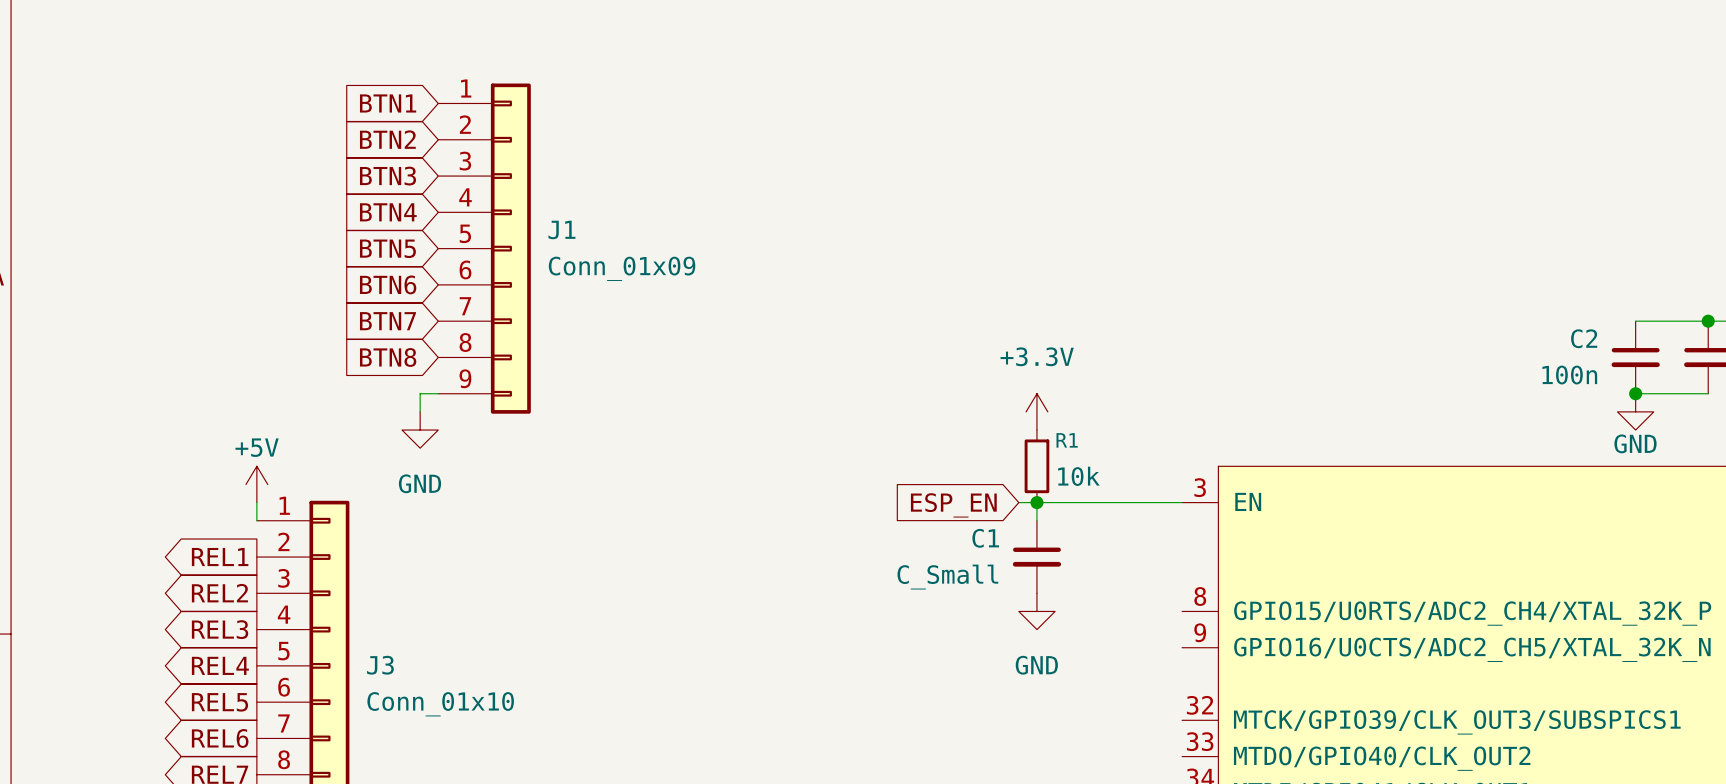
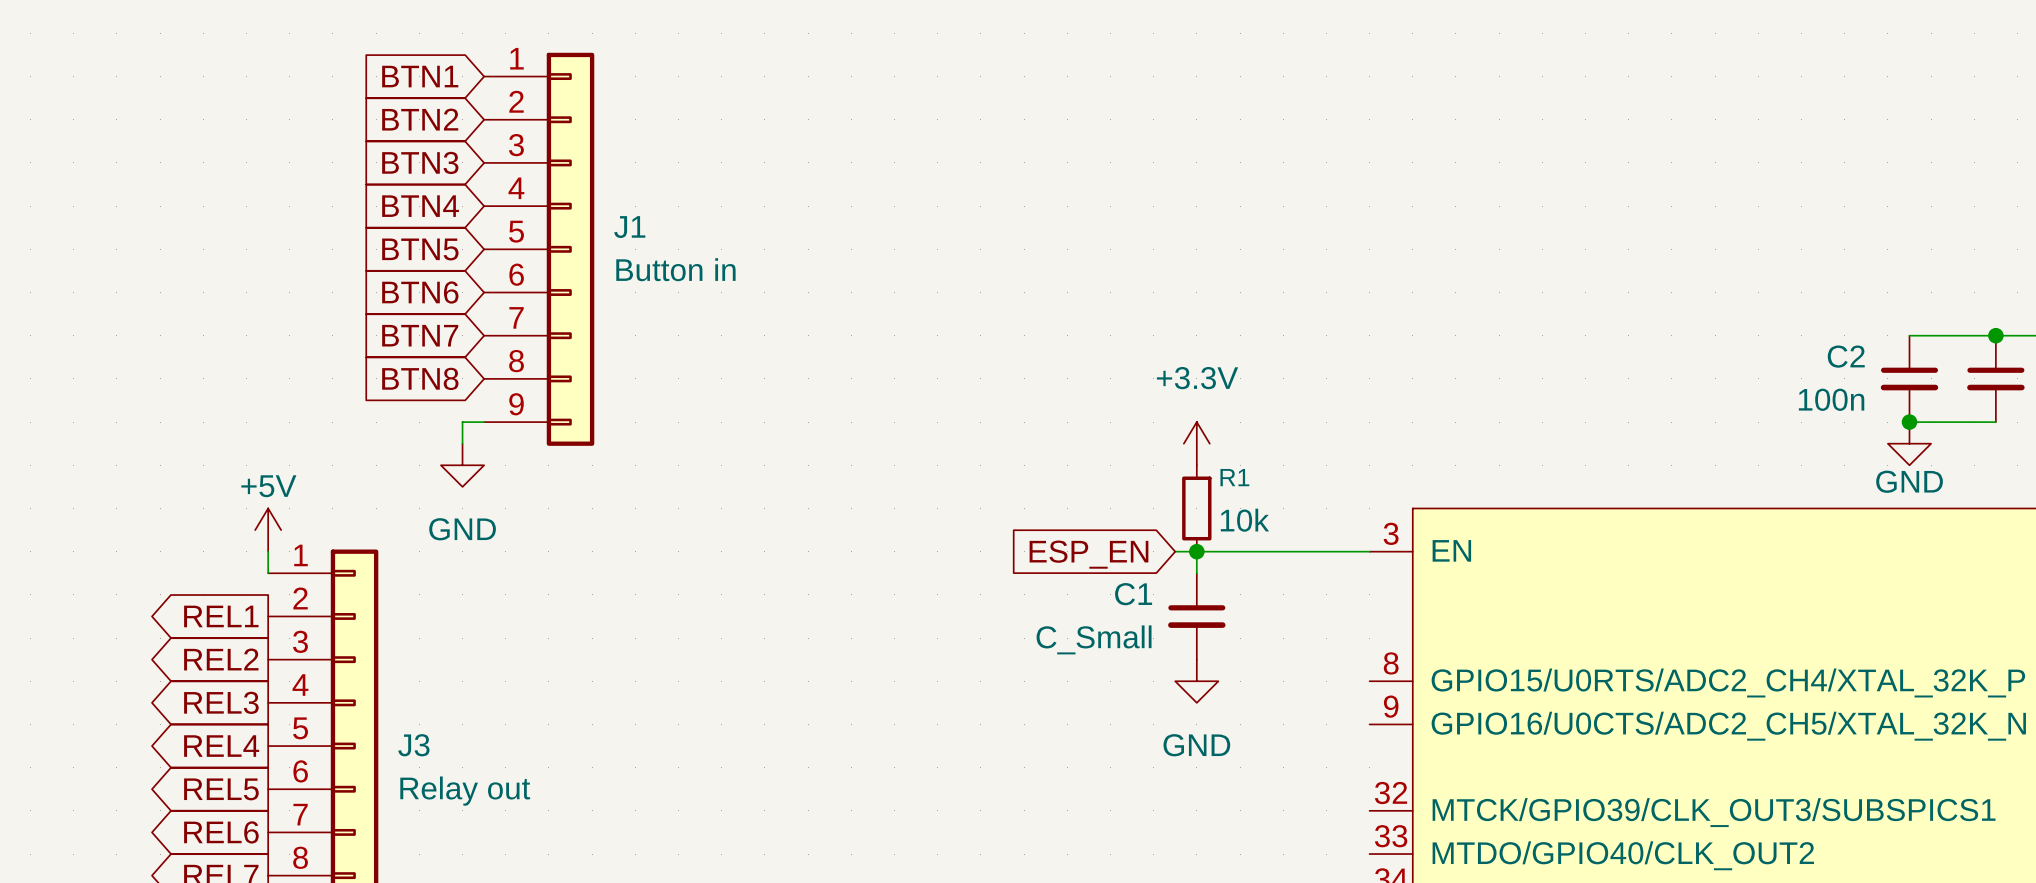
J1 value: Conn_01x09 (622, 268) -> Button in (675, 269)
J3 value: Conn_01x10 (440, 704) -> Relay out (465, 791)

